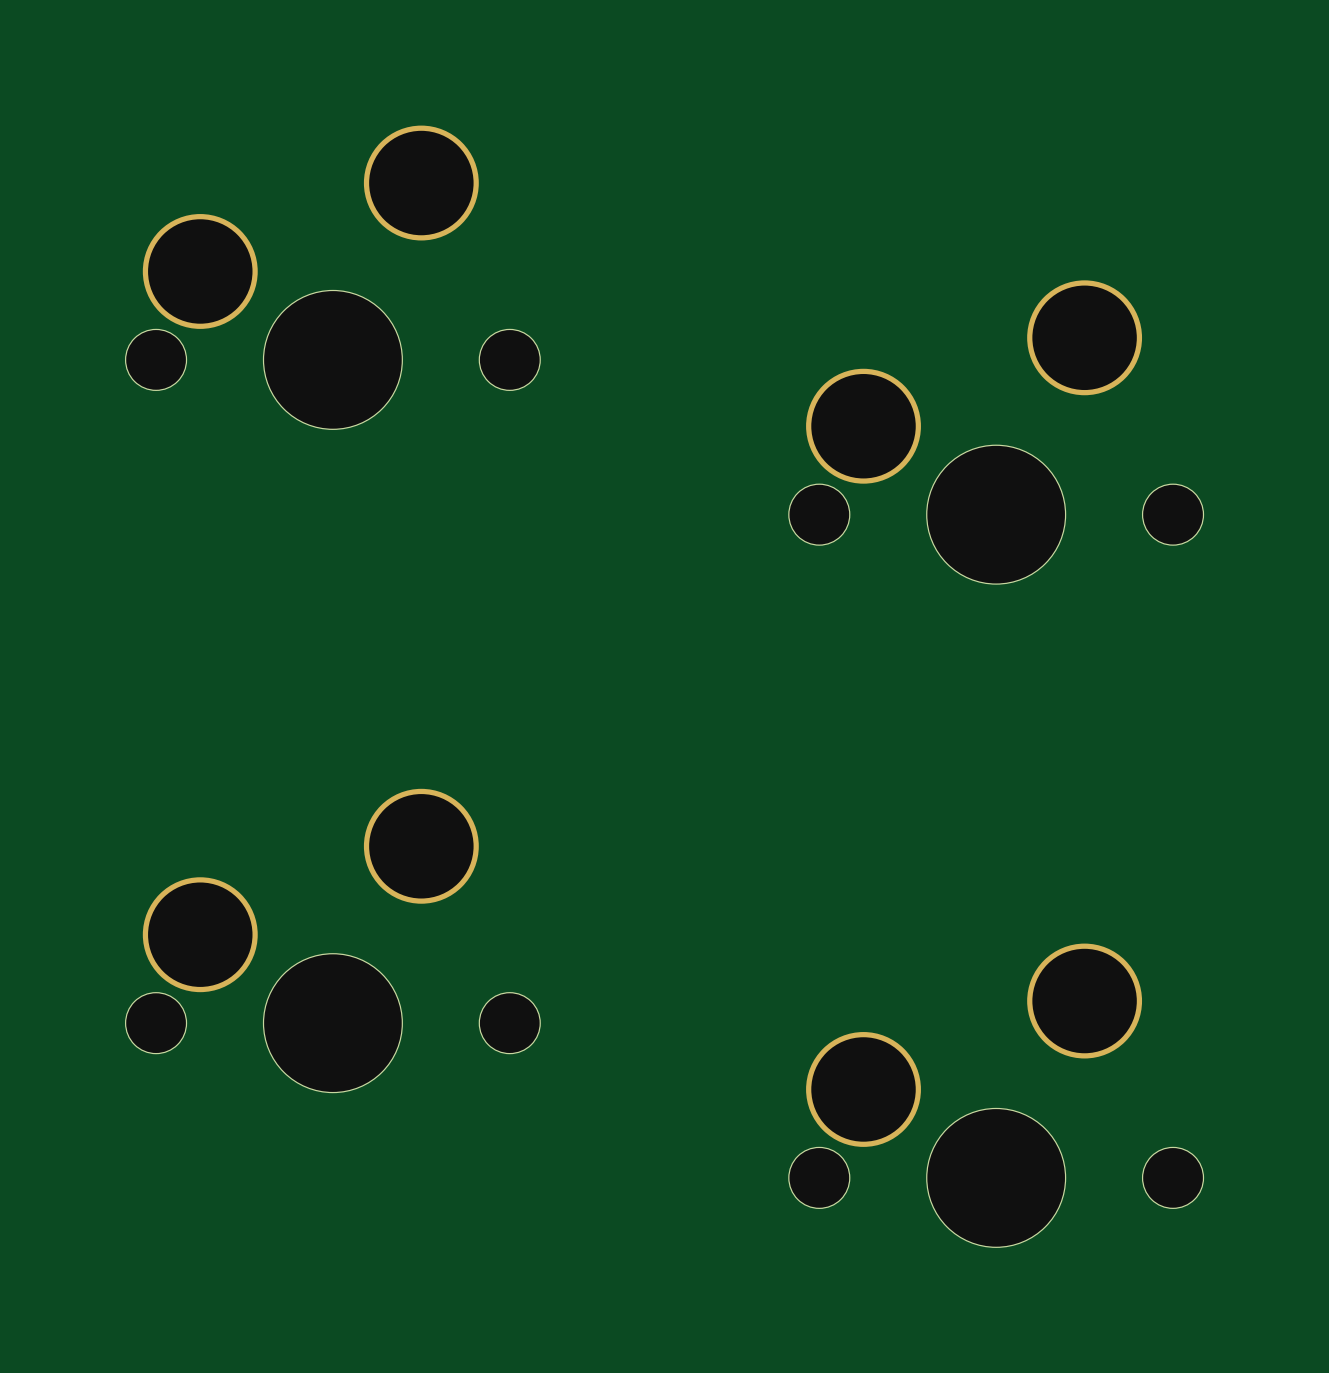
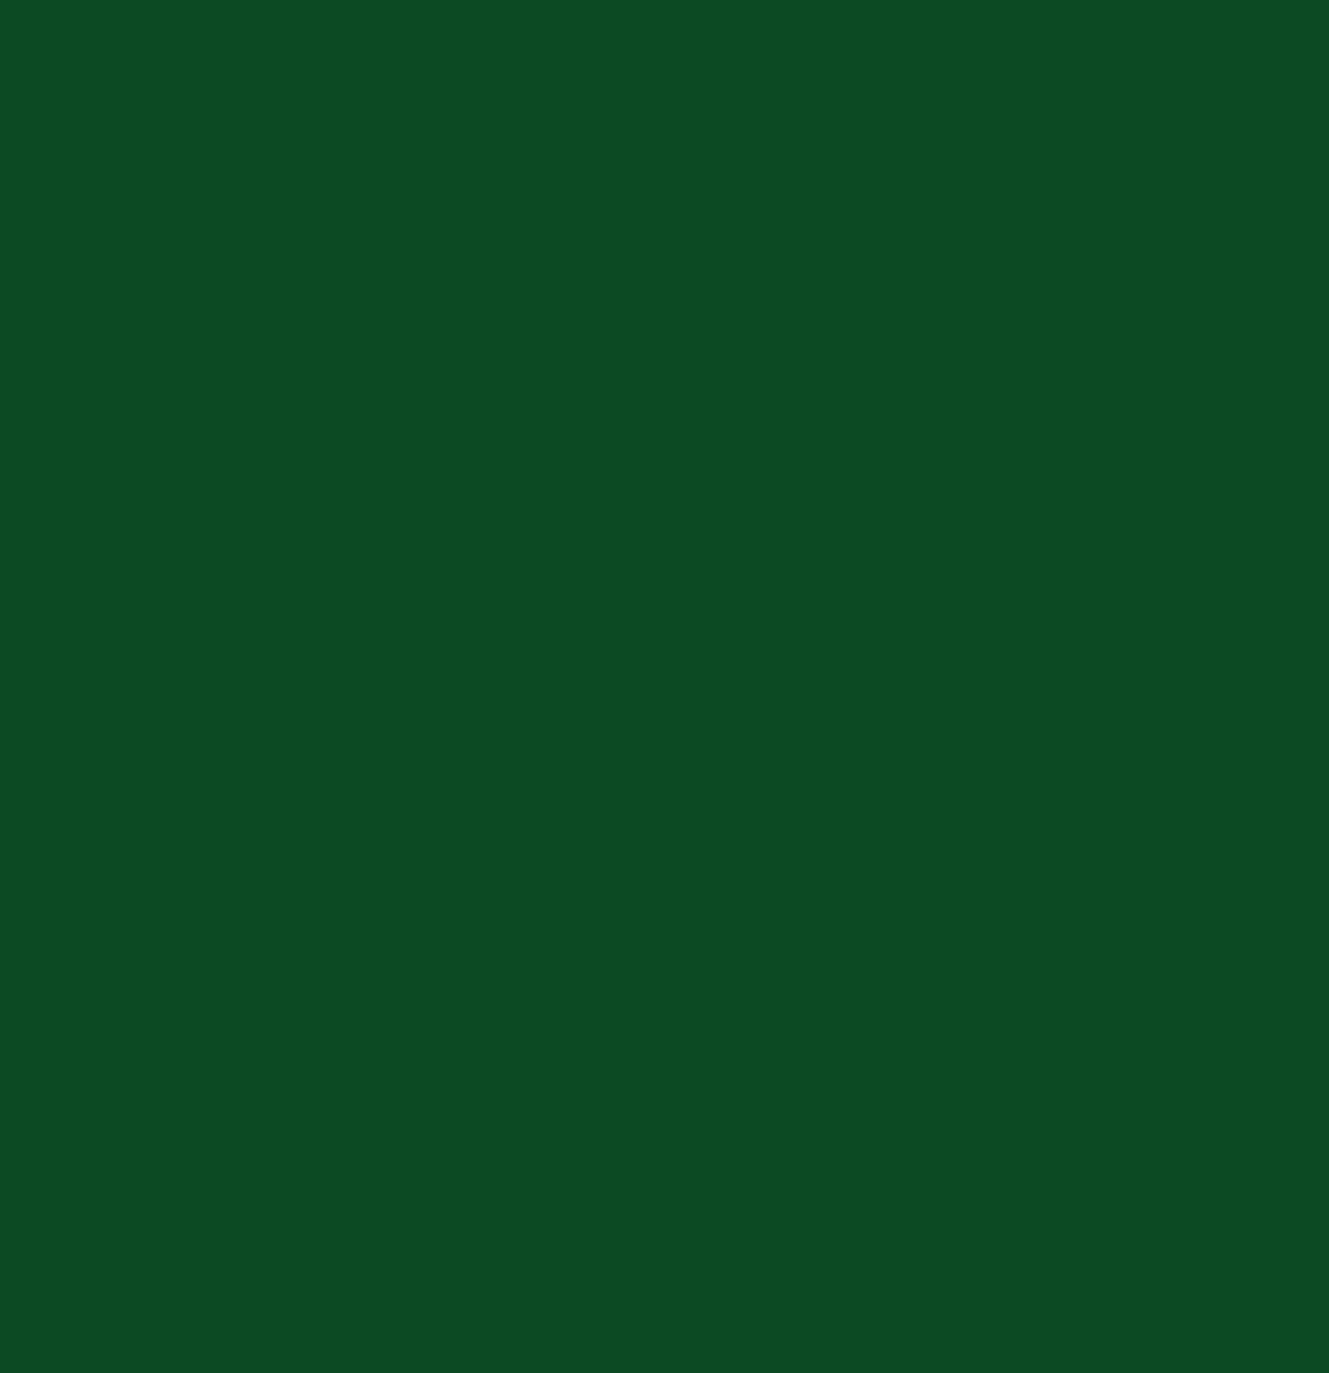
part: (332, 277) -> none
part: (996, 432) -> none
part: (332, 940) -> none
part: (996, 1095) -> none

